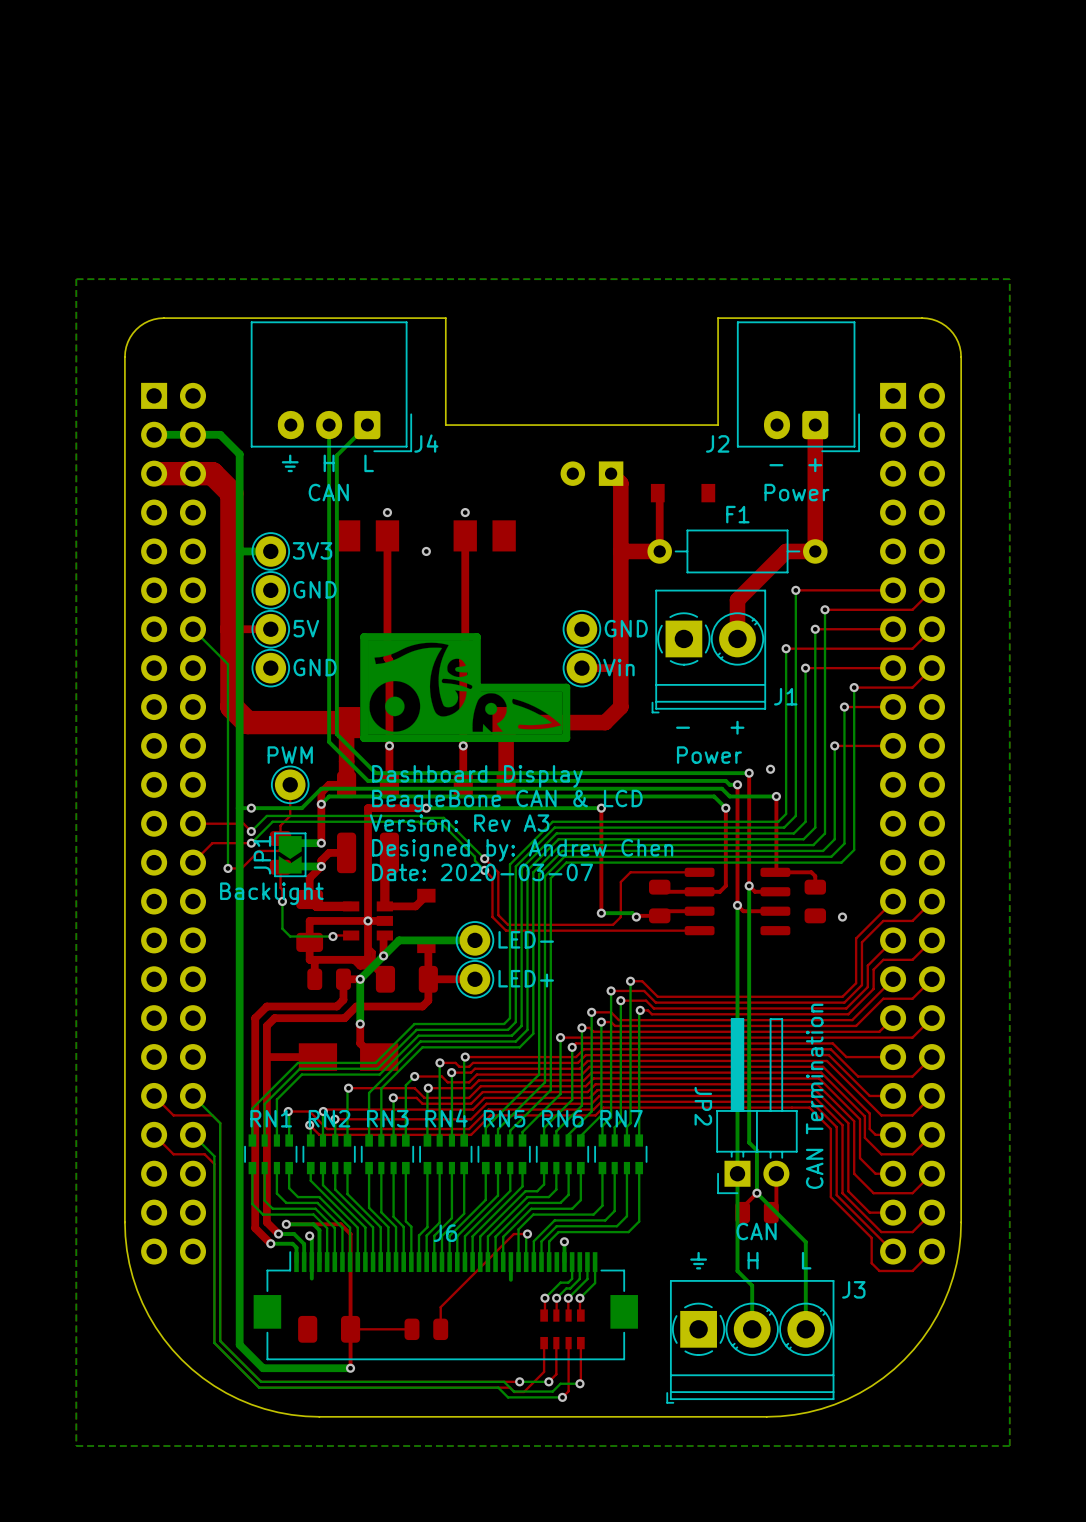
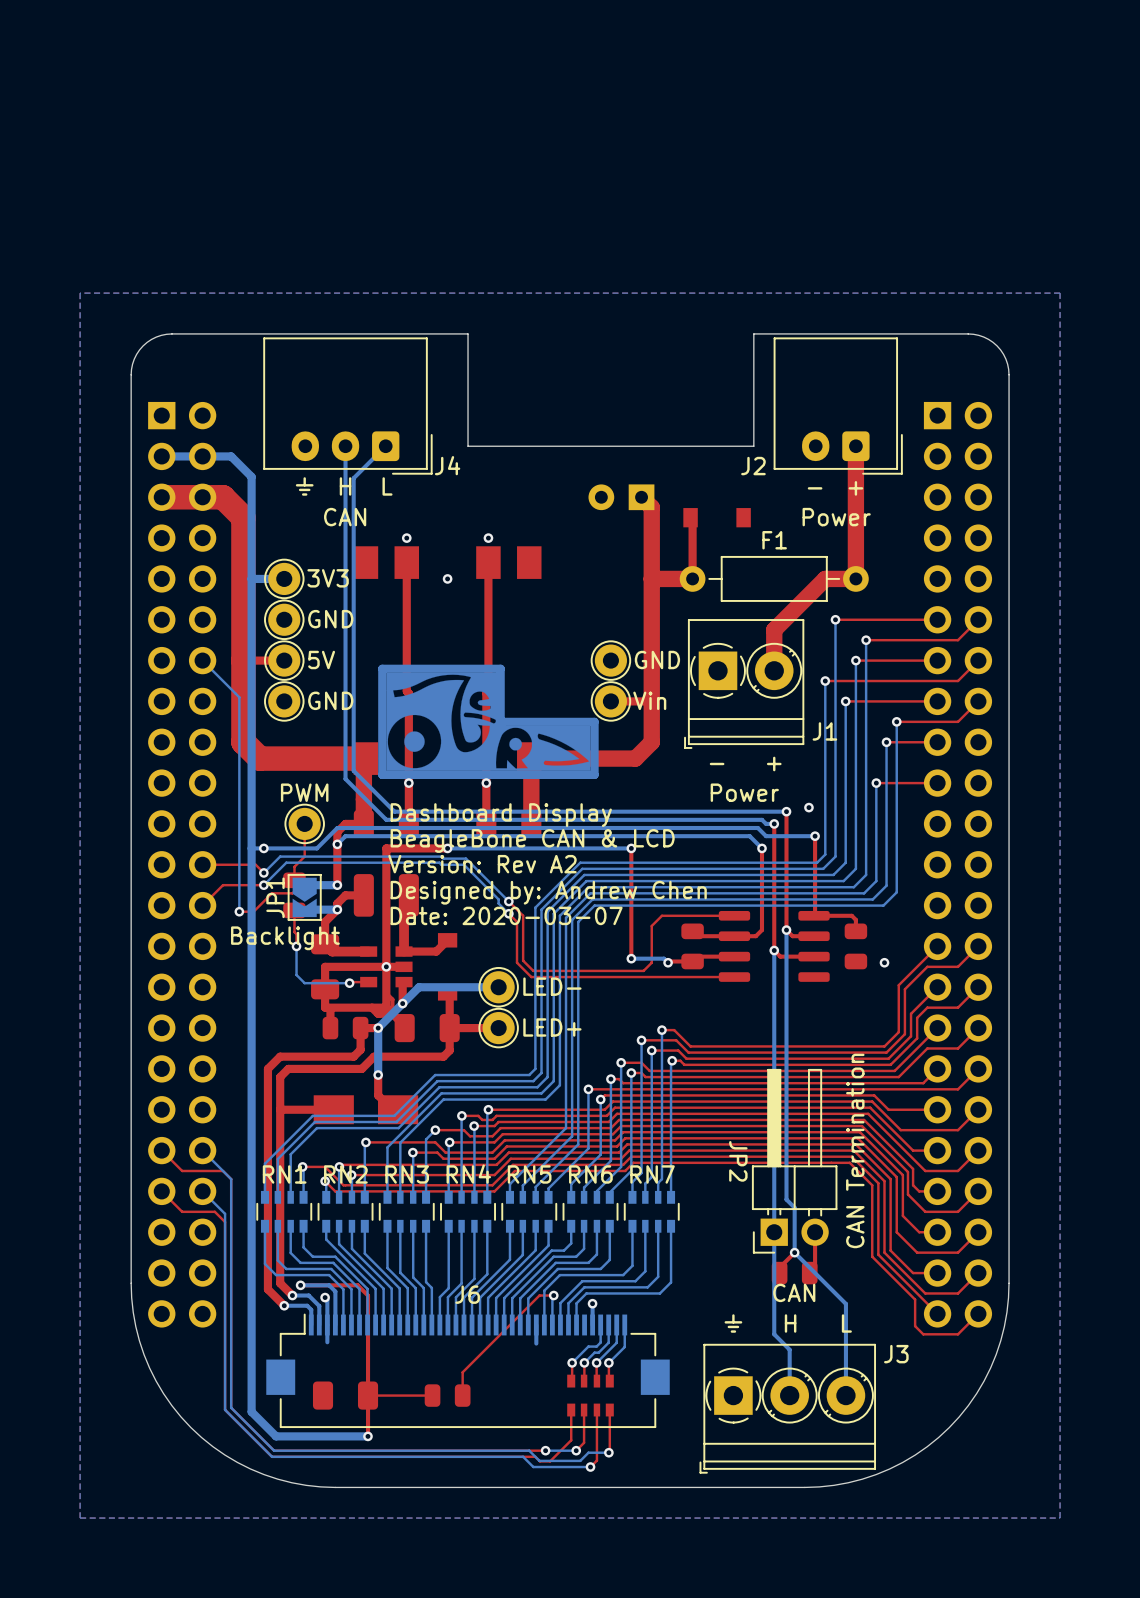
text: Version: Rev A3 (459, 823) -> Version: Rev A2 (482, 864)

